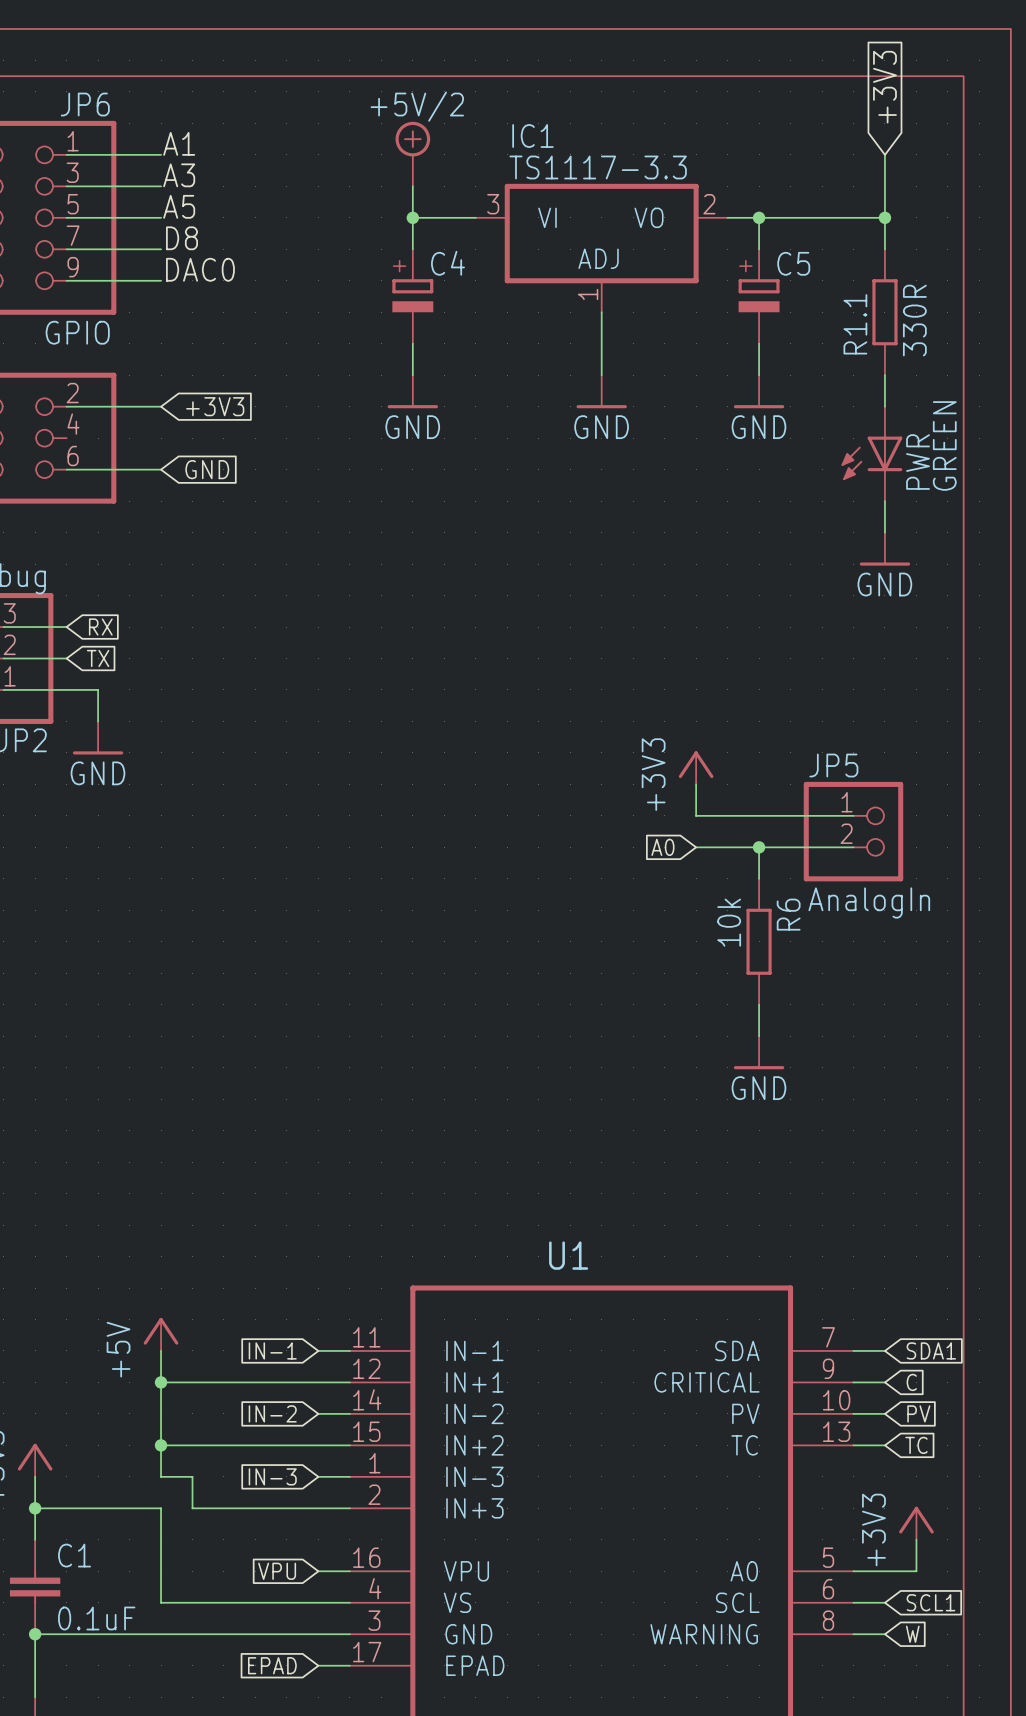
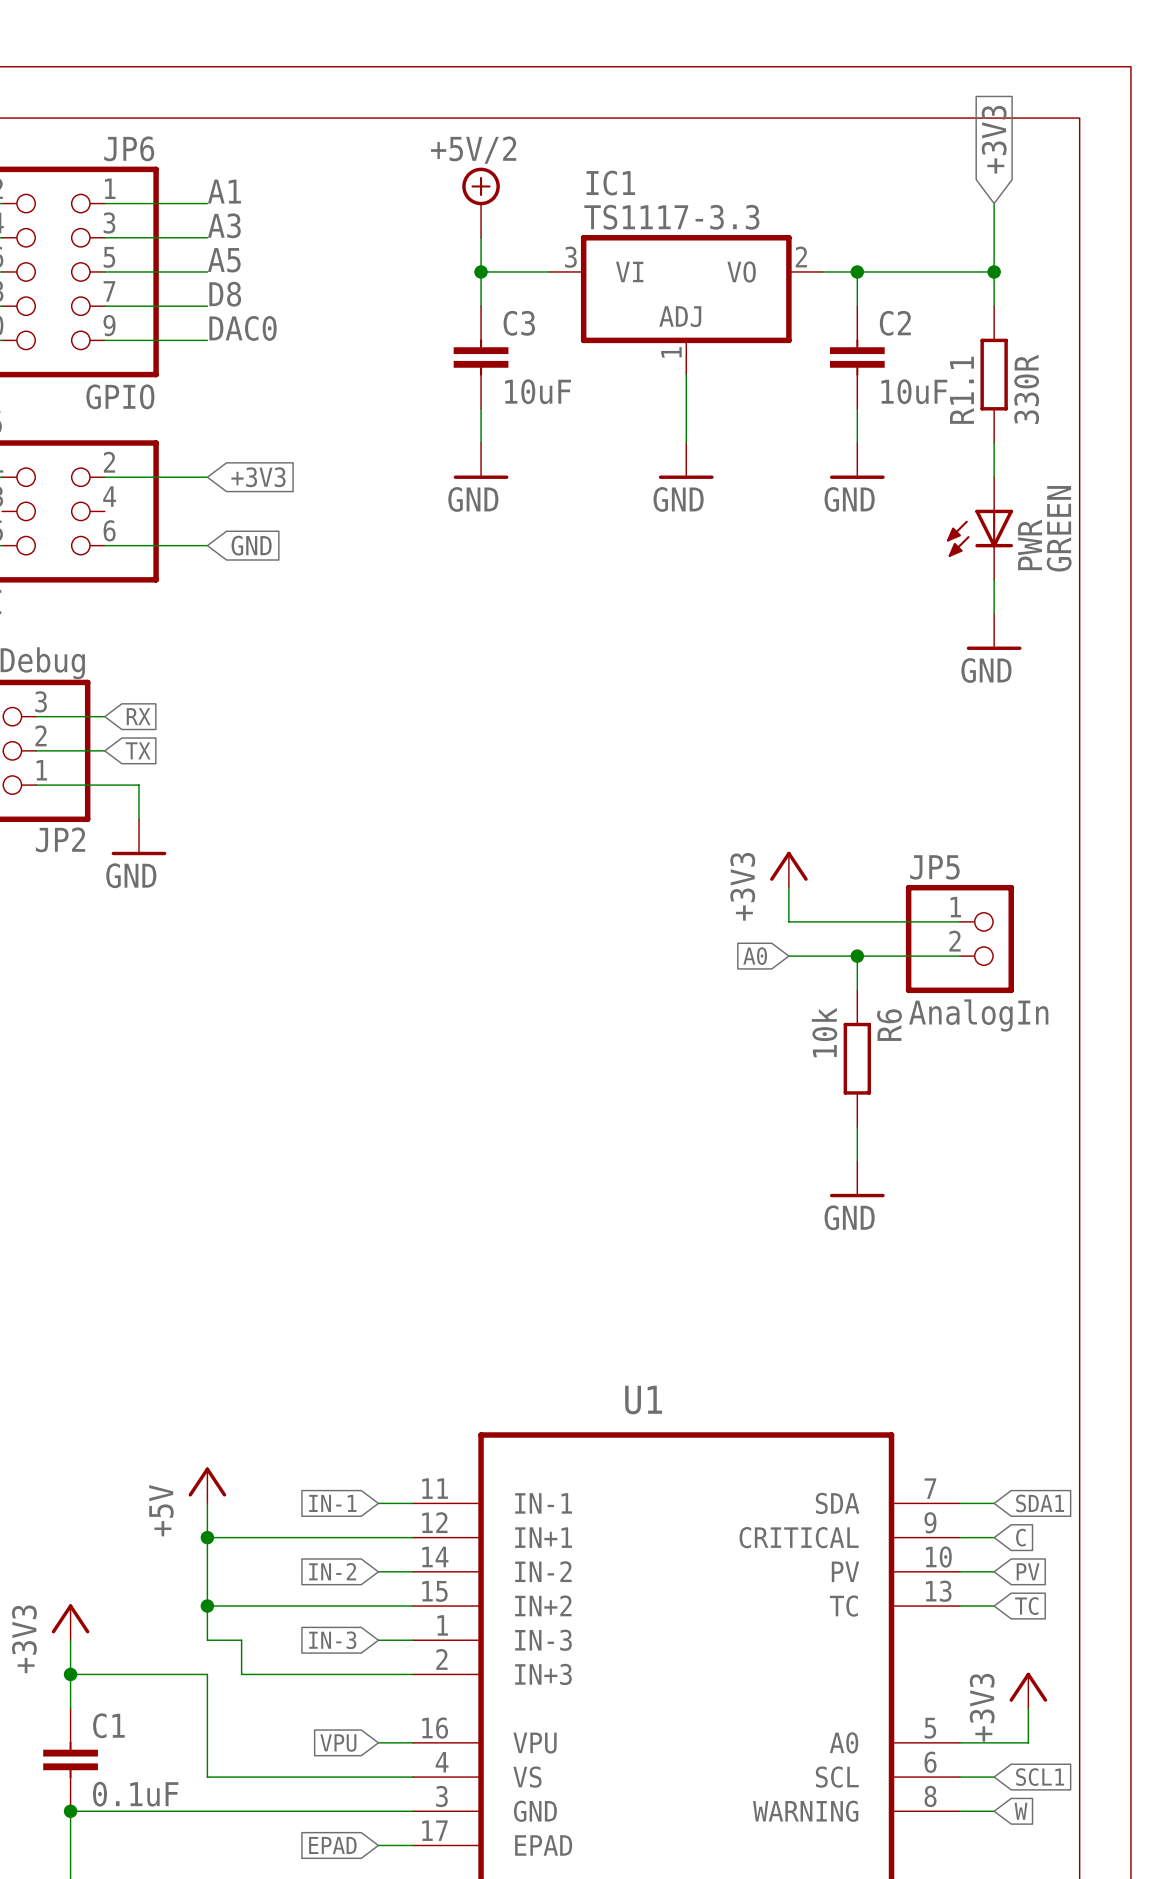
C4: (412, 296) -> none
C3: none -> 10uF (481, 357)
C5: (759, 296) -> none
C2: none -> 10uF (857, 357)

